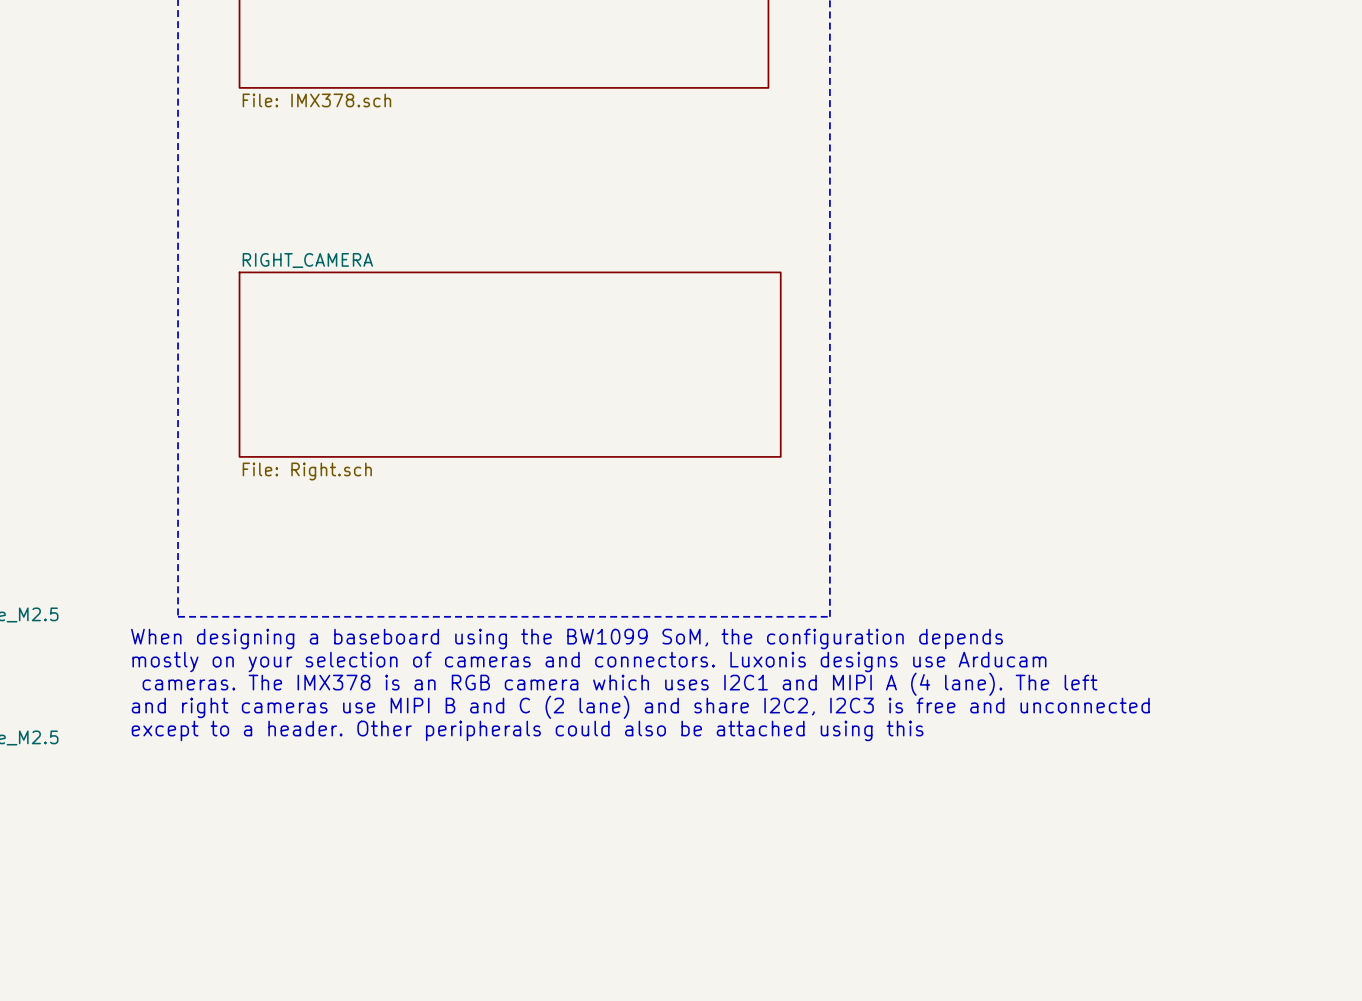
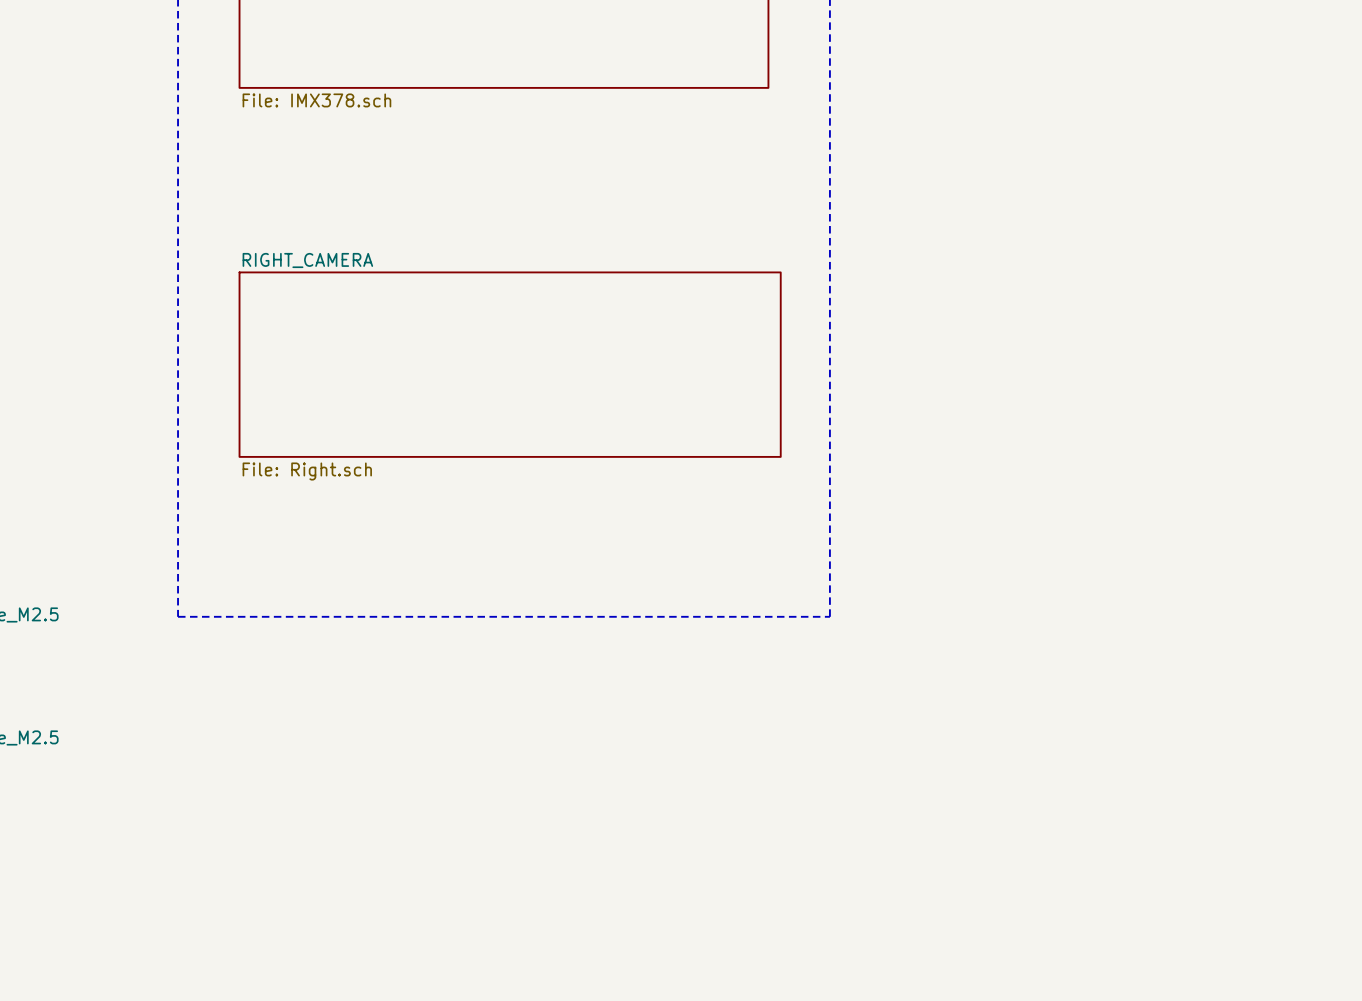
text: When designing a baseboard using the BW1099 SoM, the configuration depends (567, 639) -> none
text: mostly on your selection of cameras and connectors. Luxonis designs use Arducam (589, 661) -> none
text: cameras. The IMX378 is an RGB camera which uses I2C1 and MIPI A (4 lane). The left (620, 684) -> none
text: and right cameras use MIPI B and C (2 lane) and share I2C2, I2C3 is free and unconnected (640, 707) -> none
text: except to a header. Other peripherals could also be attached using this (527, 730) -> none

